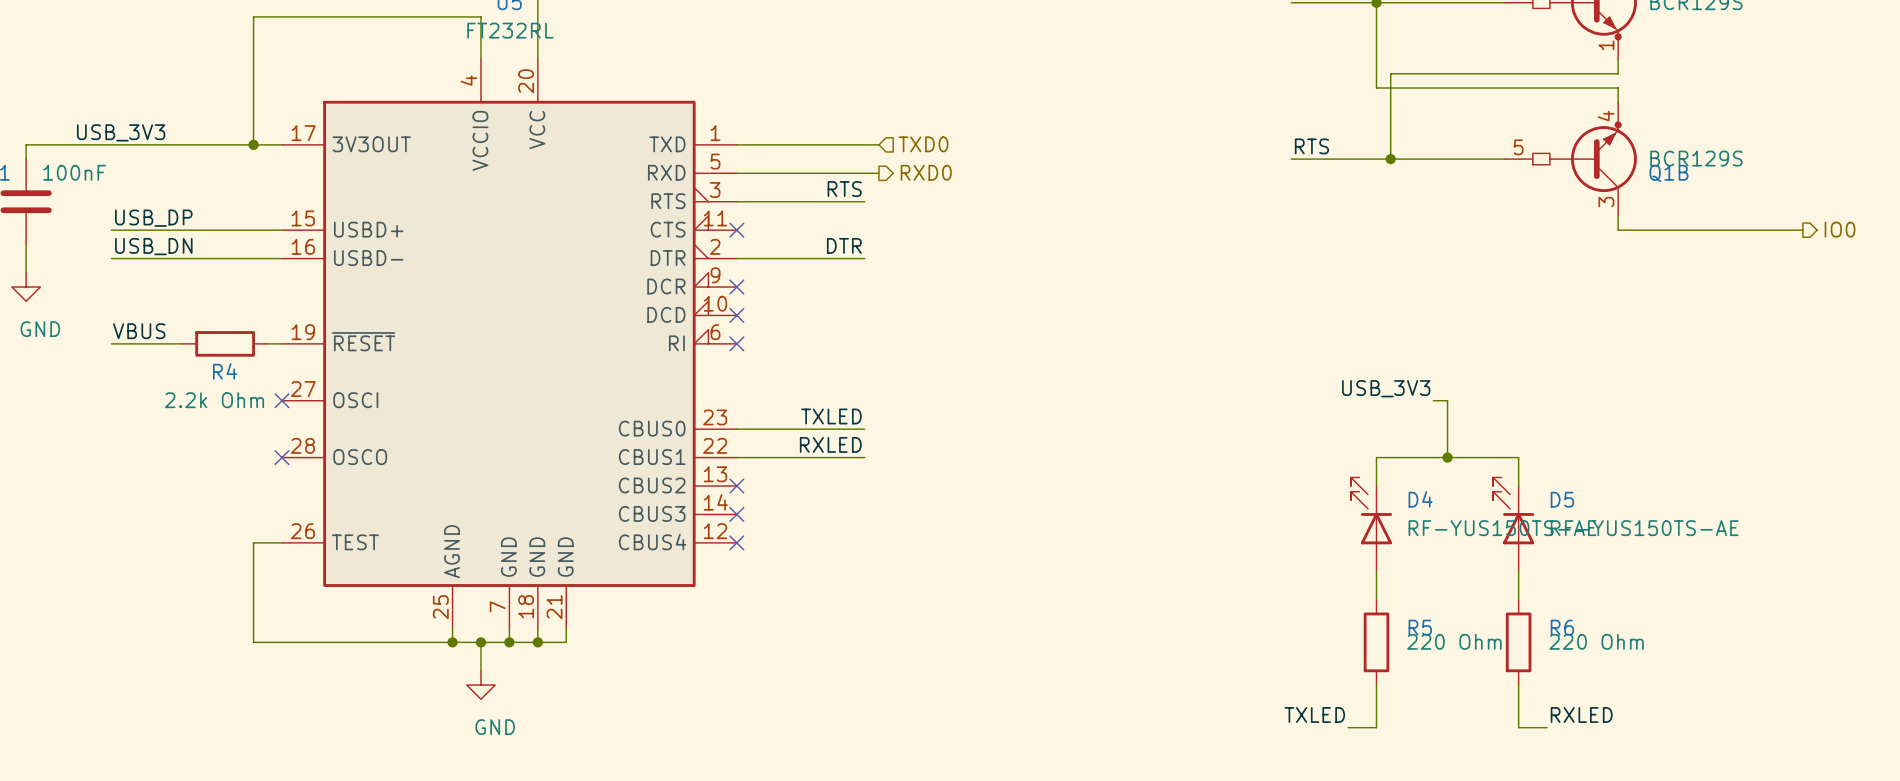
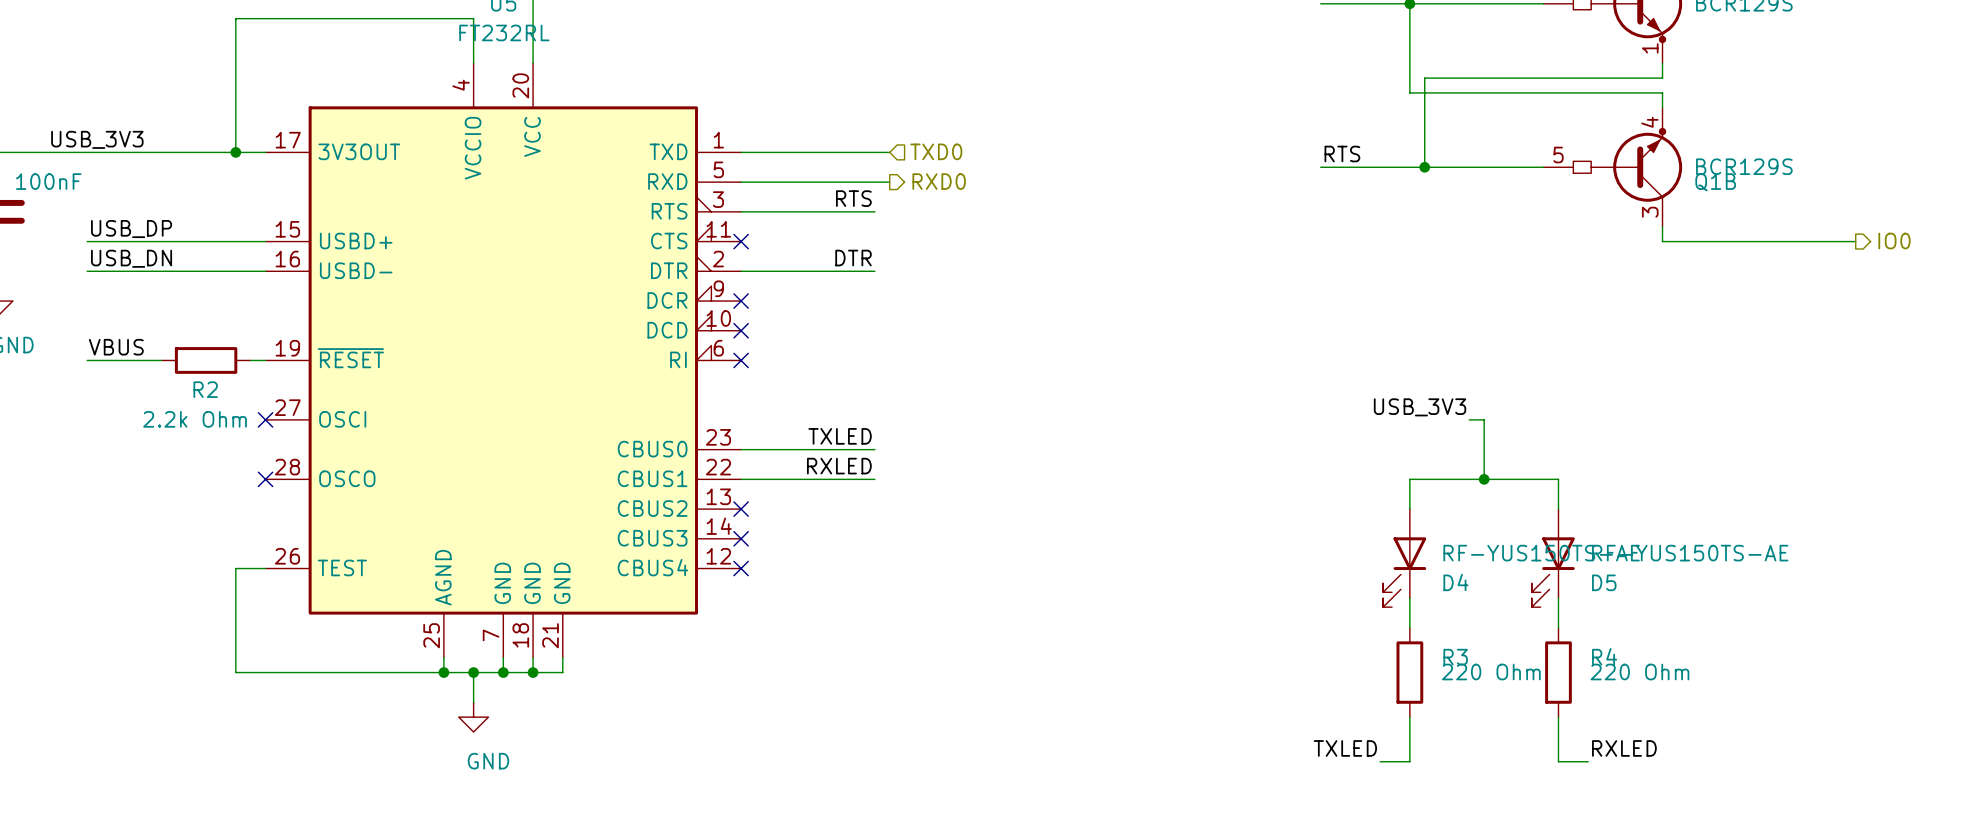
R4 name: R4 (225, 371) -> R2 (205, 389)
D4 flip: as is (1371, 510) -> up-down (1404, 572)
D5 flip: as is (1513, 510) -> up-down (1553, 572)
R5 name: R5 (1420, 627) -> R3 (1455, 657)
R6 name: R6 (1562, 627) -> R4 (1604, 656)

